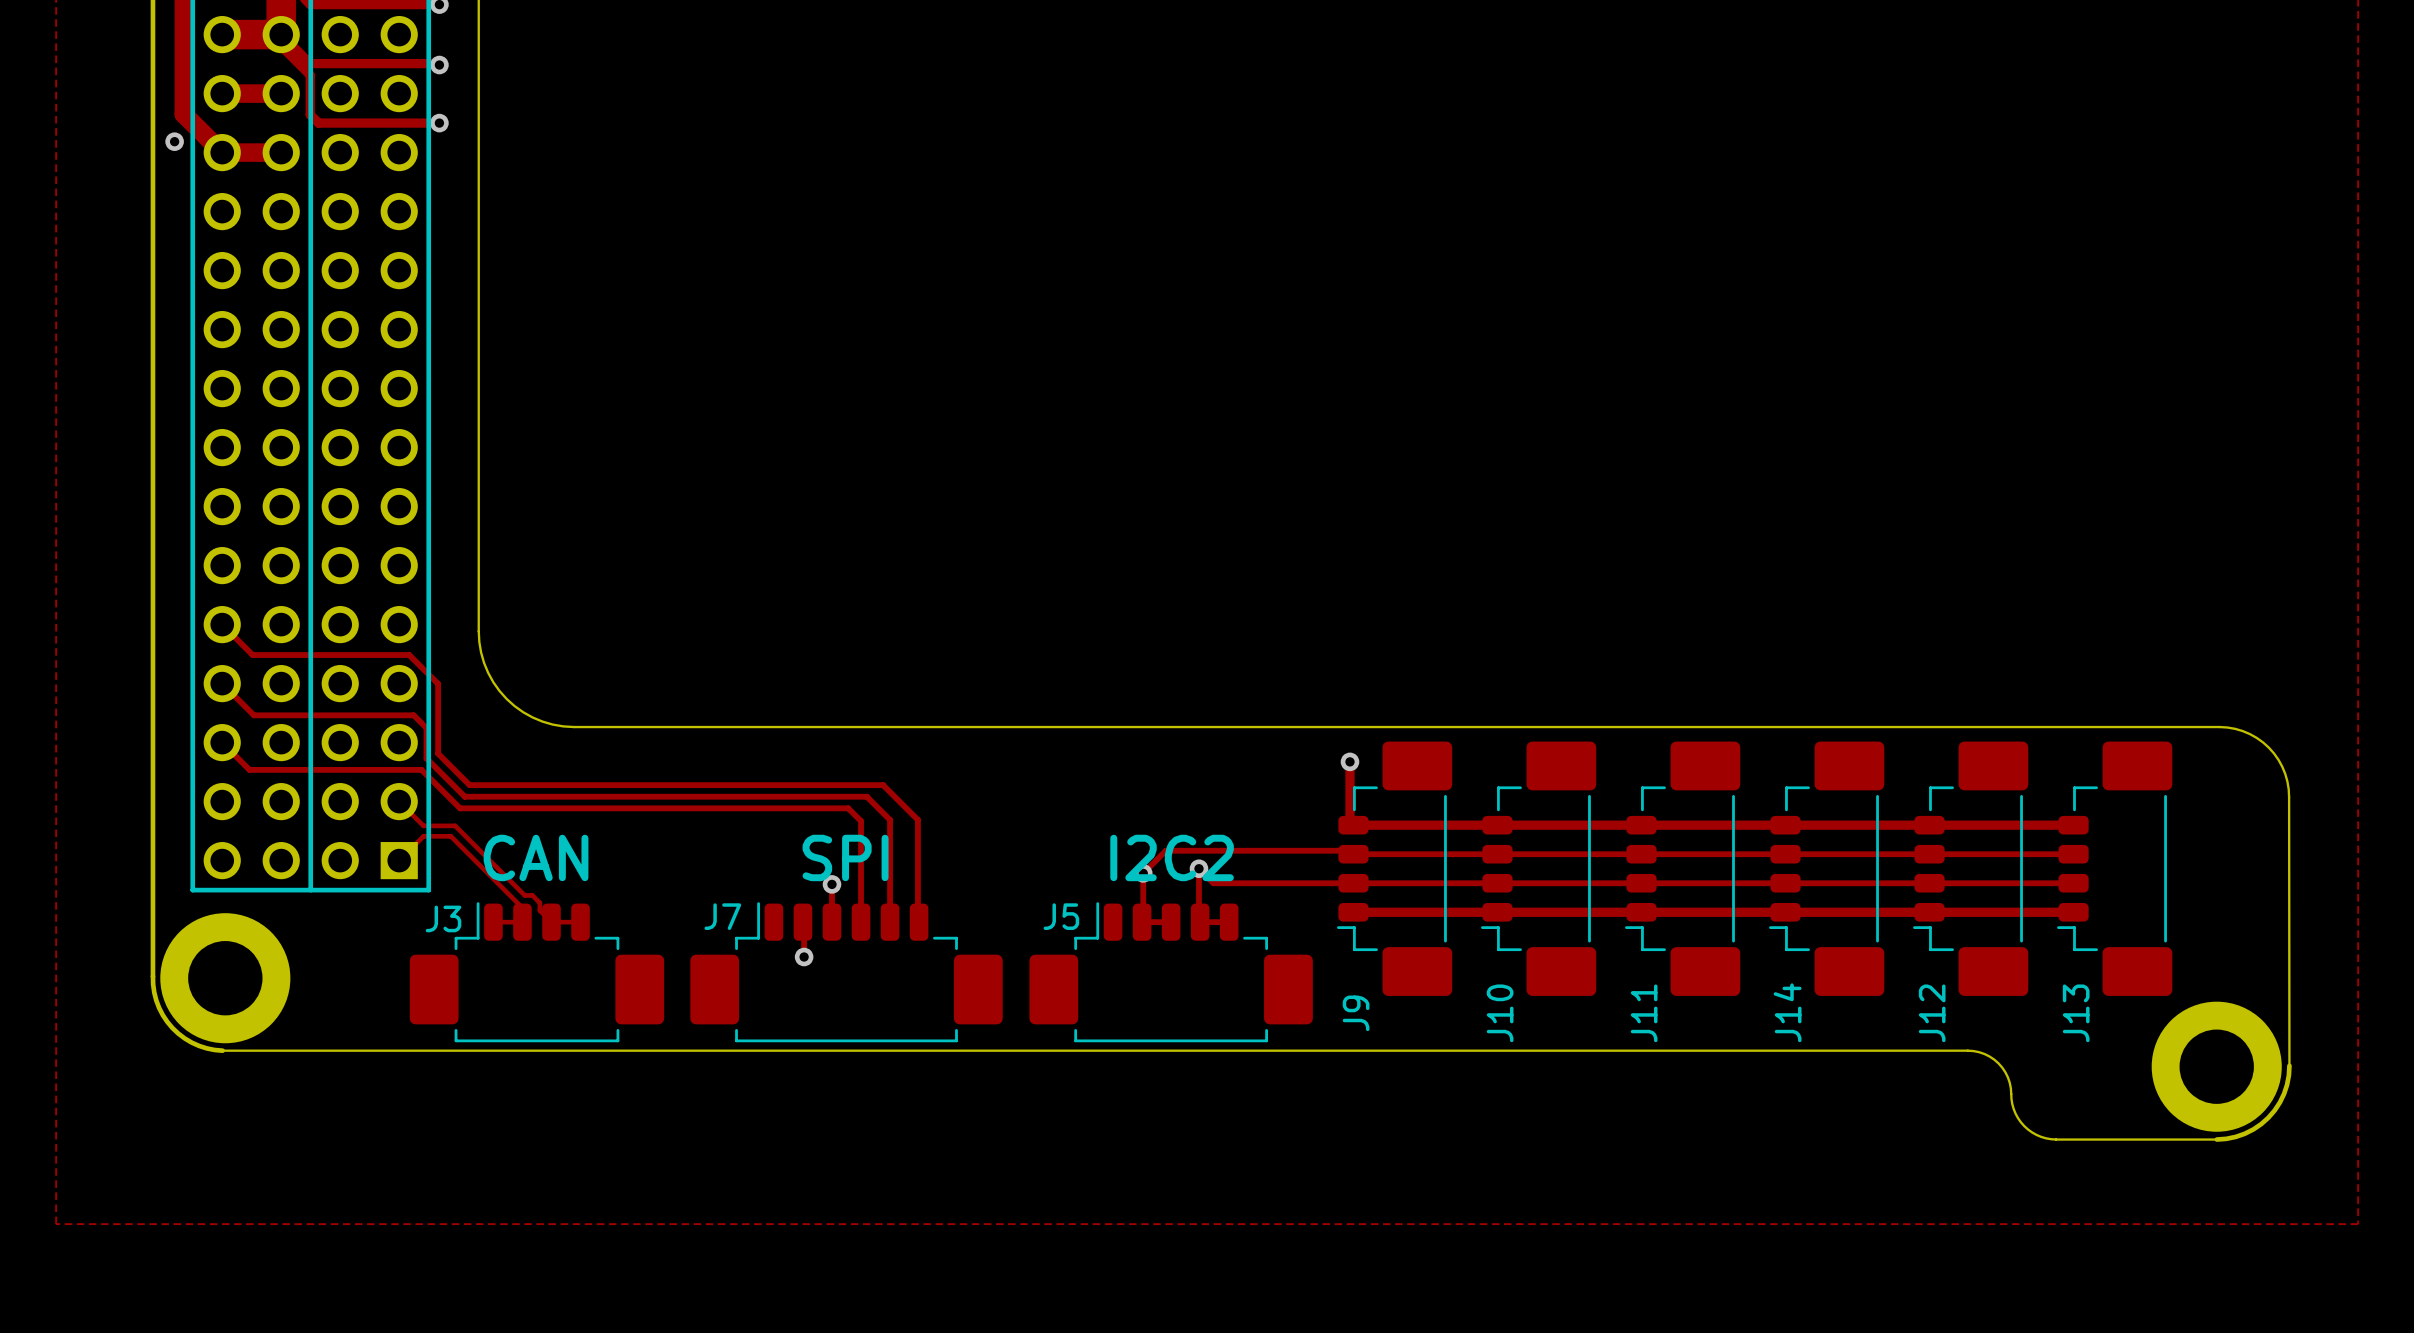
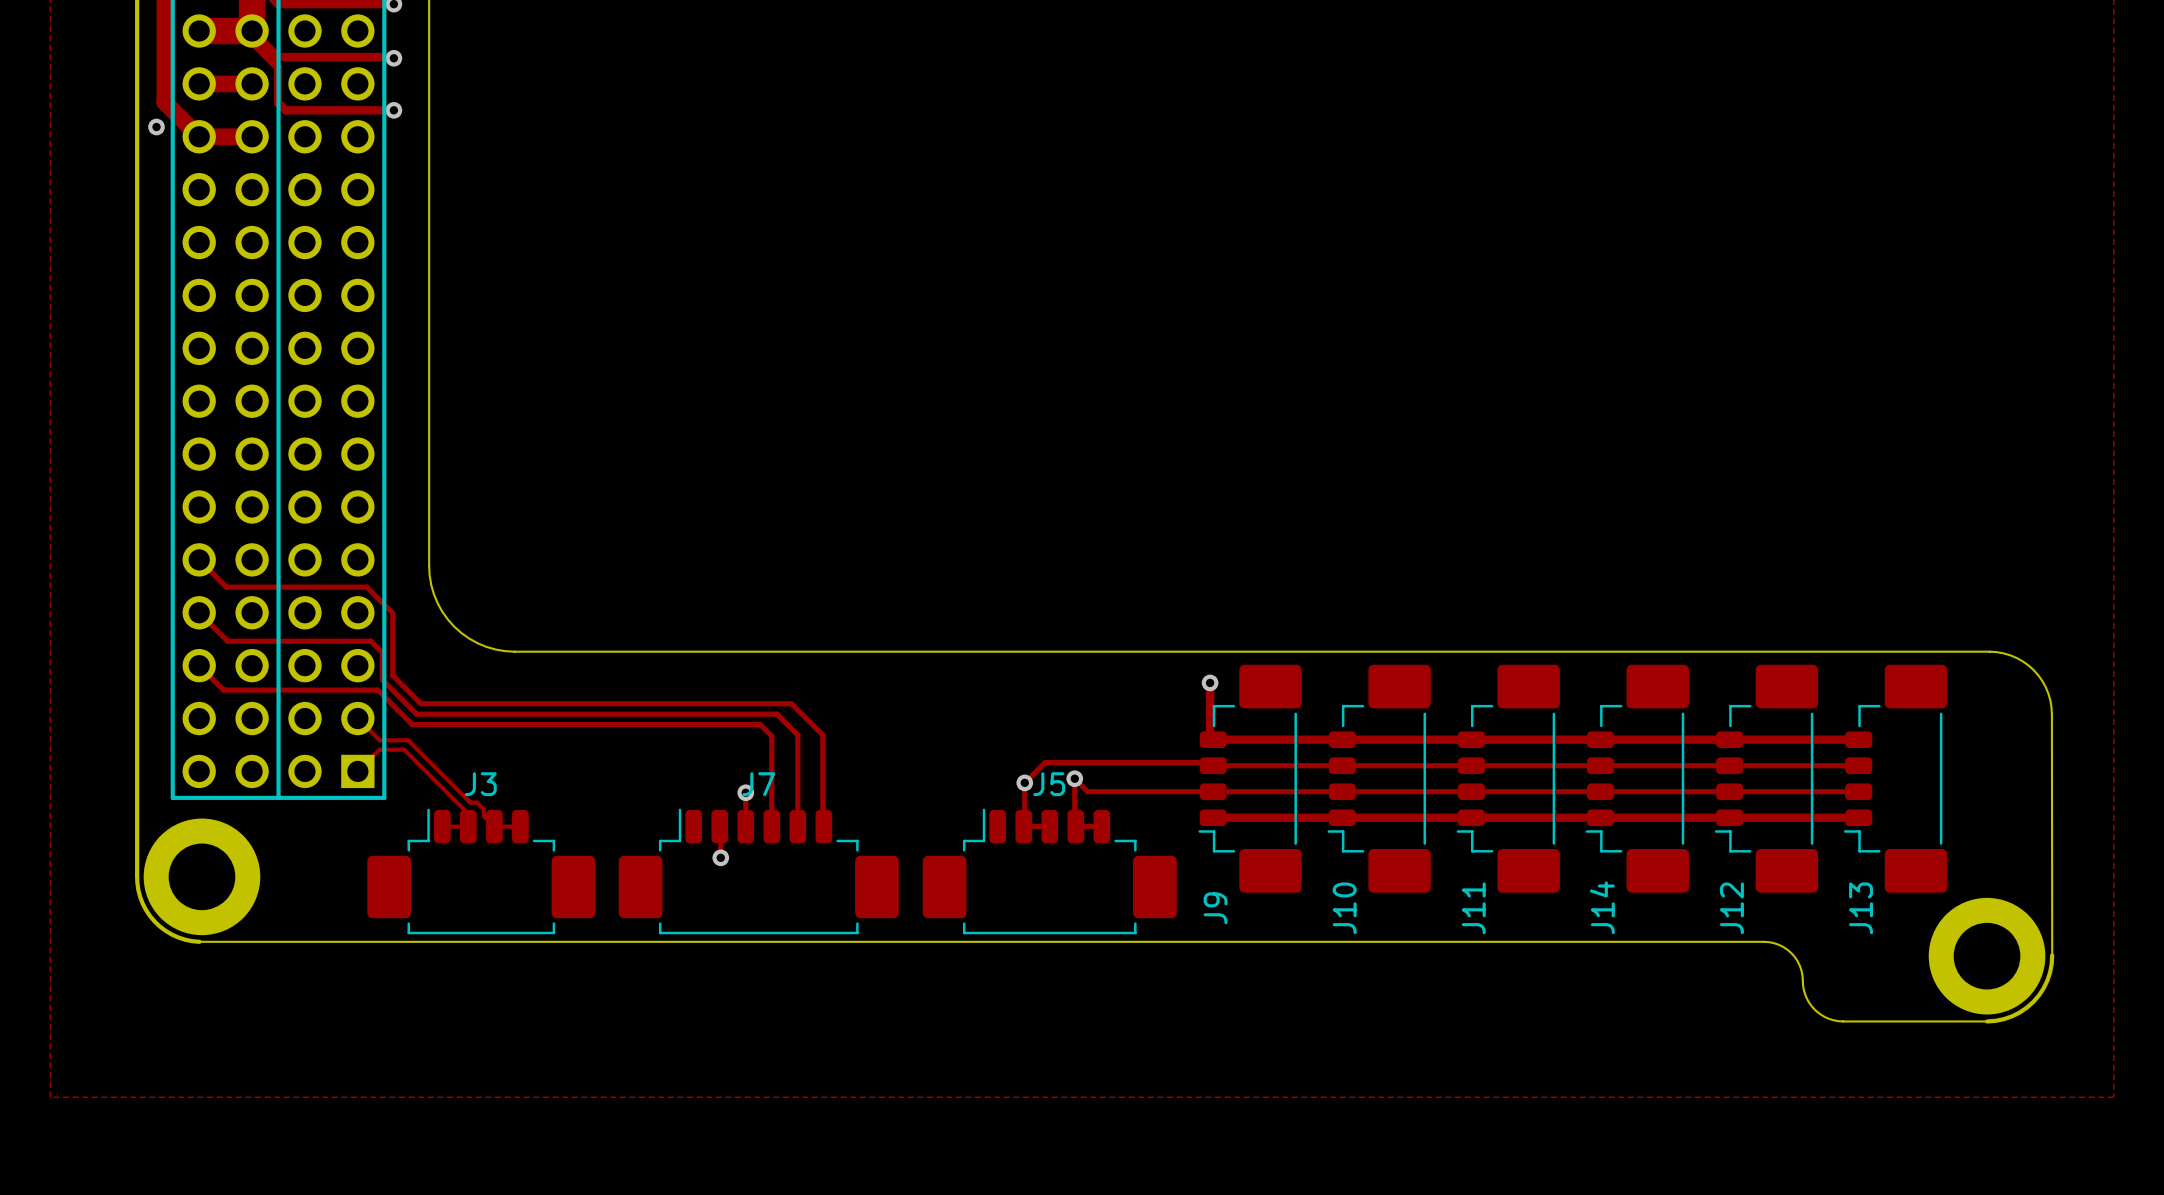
text: CAN (536, 857) -> none
text: SPI (845, 857) -> none
text: I2C2 (1172, 857) -> none
J7 name position: J7 (722, 916) -> J7 (758, 784)
J5 name position: J5 (1061, 916) -> J5 (1049, 784)
J3 name position: J3 (443, 918) -> J3 (480, 784)

